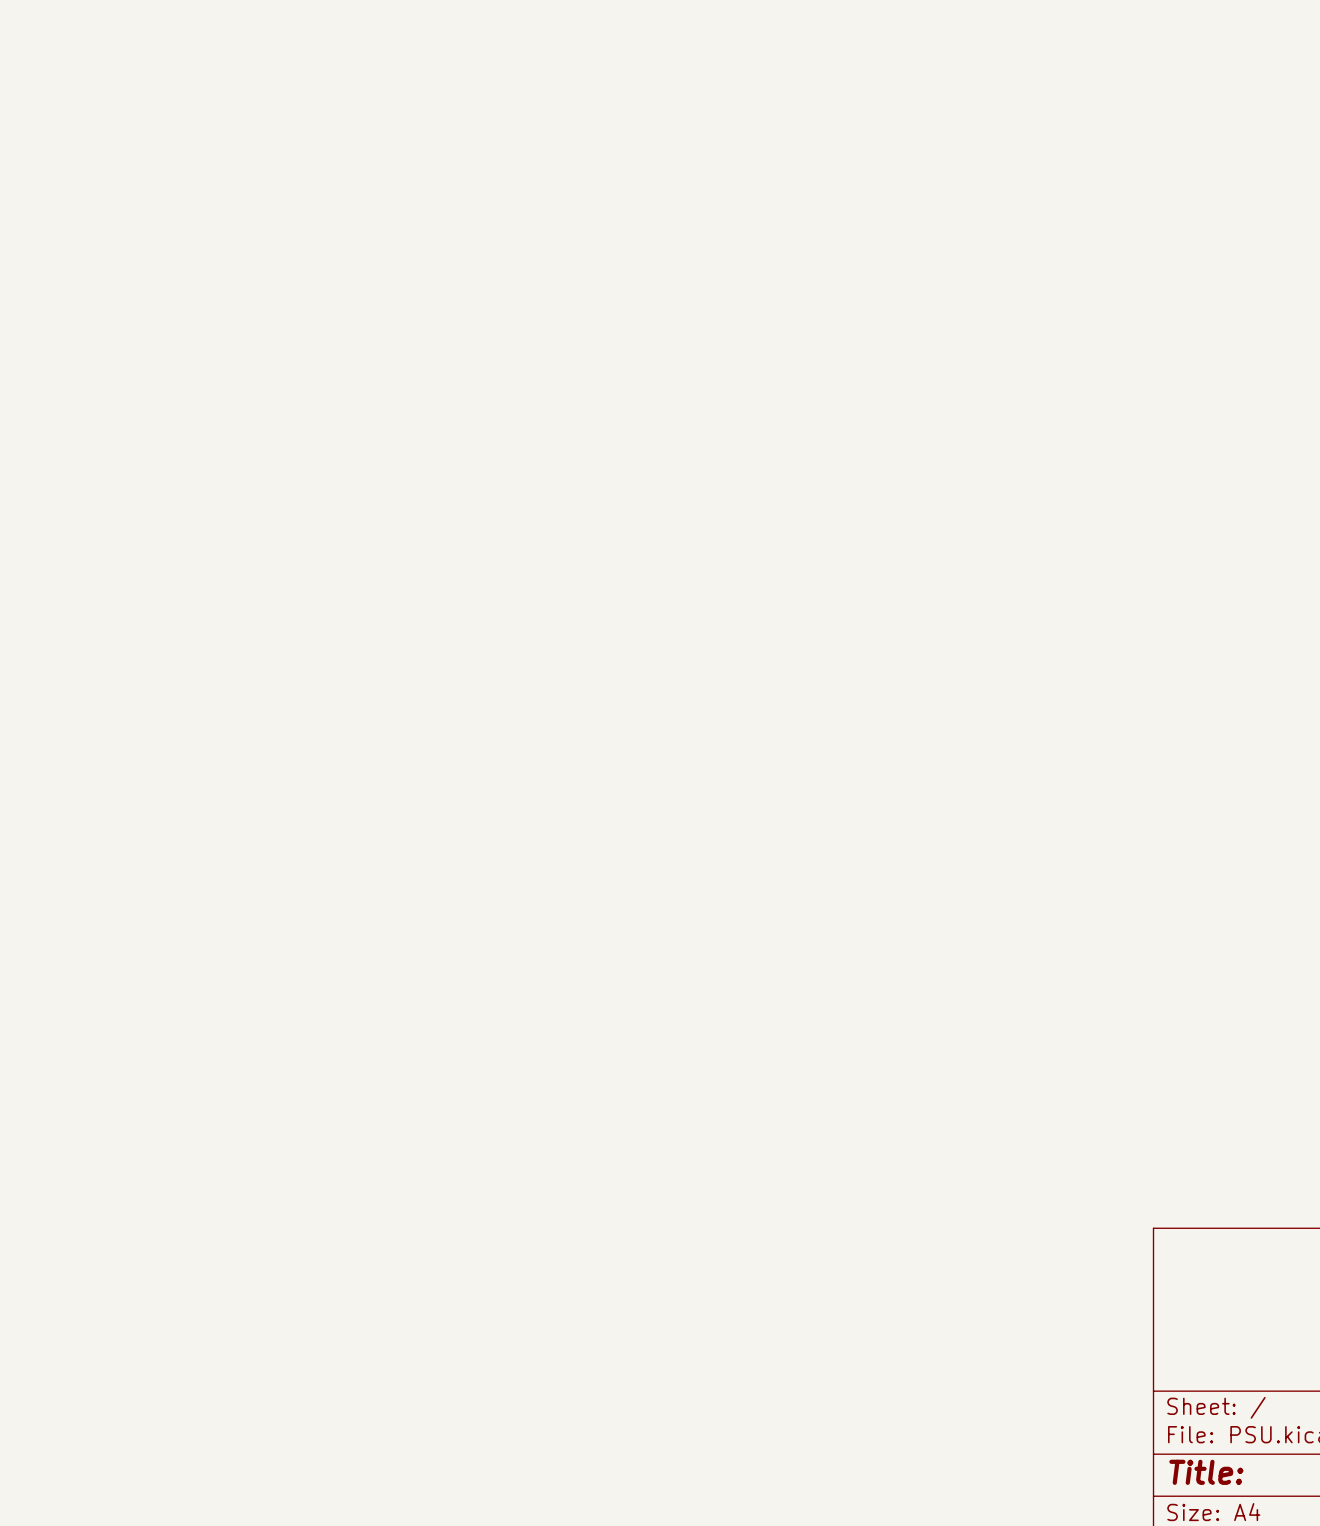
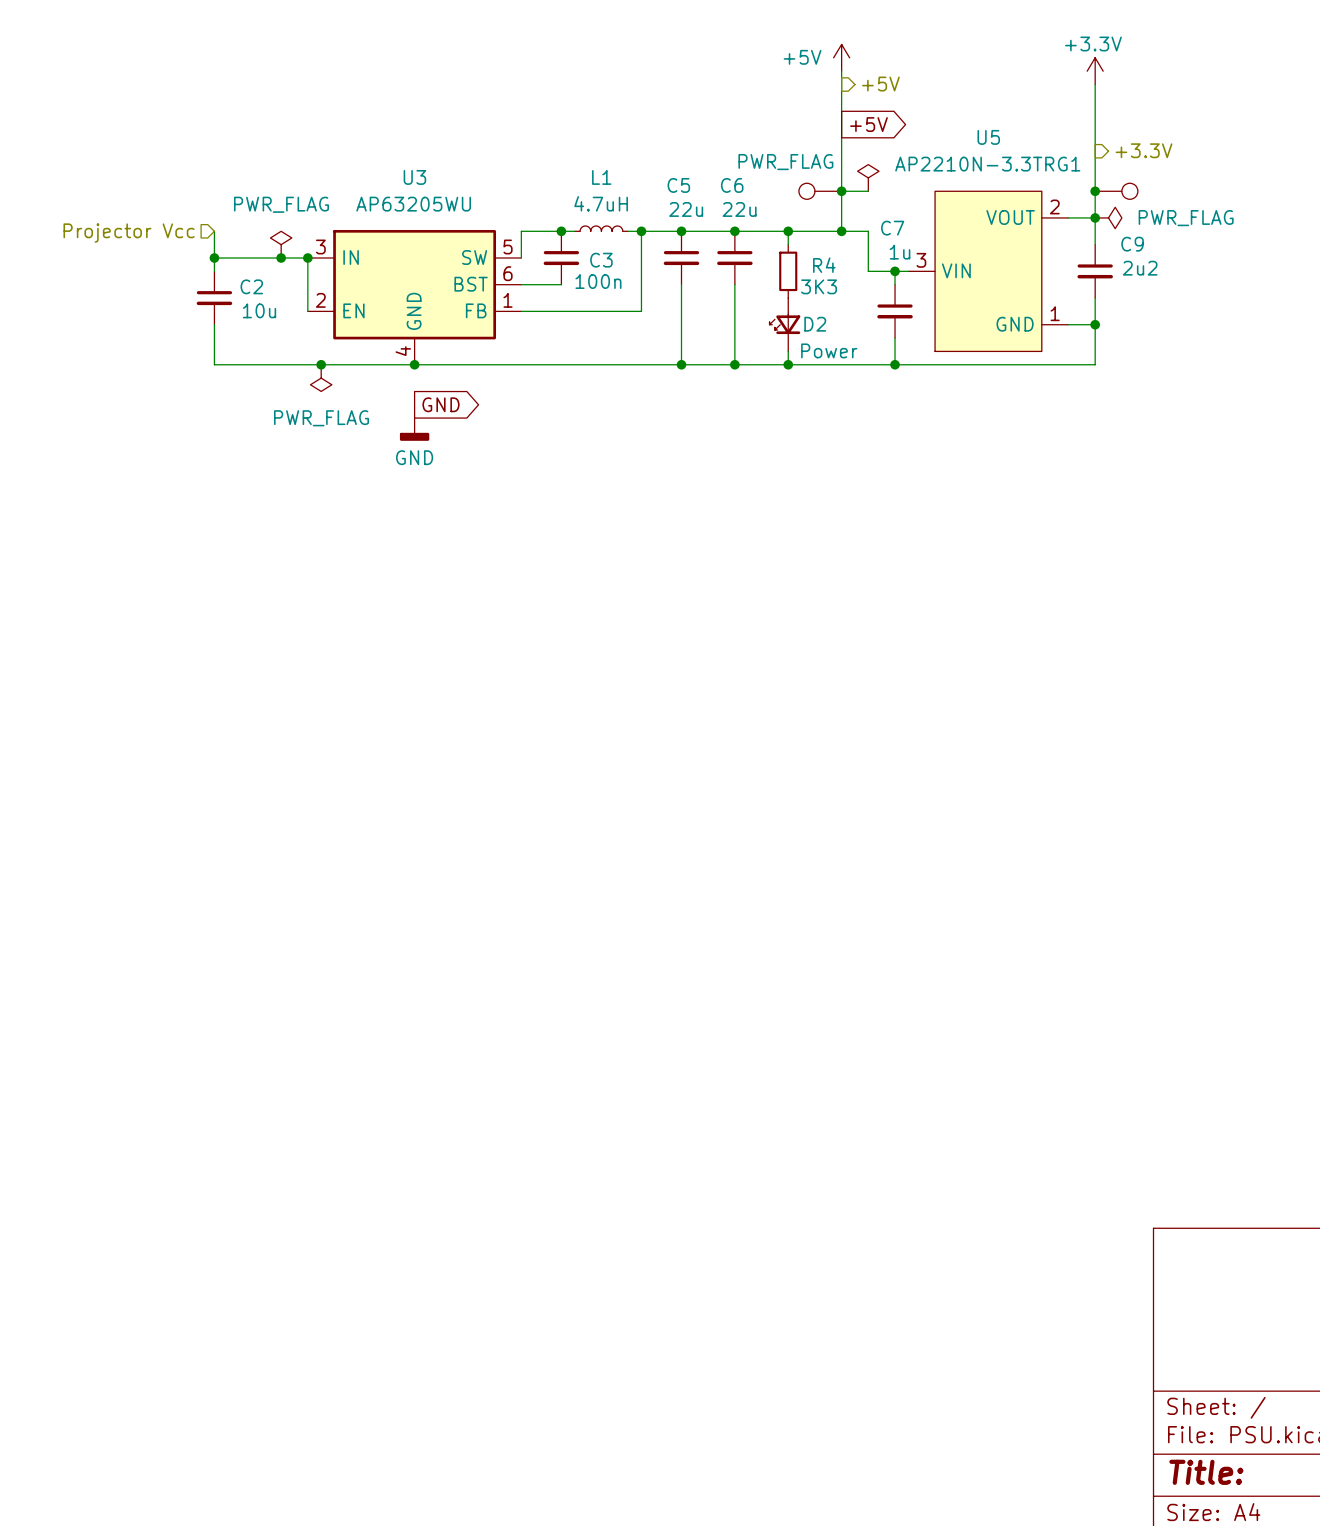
power symbol: none -> +5V (841, 57)
wire: none -> (841, 71) (841, 231)
power symbol: none -> +3.3V (1095, 71)
hierarchical label: none -> +5V (880, 84)
wire: none -> (1095, 84) (1095, 244)
global label: none -> +5V (868, 124)
hierarchical label: none -> +3.3V (1144, 150)
power symbol: none -> PWR_FLAG (868, 177)
part: none -> (820, 191)
wire: none -> (841, 191) (868, 191)
junction: none -> (841, 191)
junction: none -> (1095, 191)
part: none -> (1116, 191)
wire: none -> (1068, 217) (1095, 217)
junction: none -> (1095, 217)
power symbol: none -> PWR_FLAG (1108, 217)
L1: none -> 4.7uH (601, 228)
wire: none -> (214, 231) (214, 271)
junction: none -> (561, 231)
wire: none -> (574, 231) (521, 231) (521, 258)
wire: none -> (628, 231) (868, 231) (868, 271) (908, 271)
wire: none -> (641, 231) (641, 311) (521, 311)
junction: none -> (641, 231)
junction: none -> (681, 231)
junction: none -> (734, 231)
wire: none -> (788, 231) (788, 244)
junction: none -> (788, 231)
junction: none -> (841, 231)
hierarchical label: none -> Projector Vcc (129, 233)
power symbol: none -> PWR_FLAG (281, 244)
wire: none -> (214, 258) (307, 258) (307, 311)
junction: none -> (214, 258)
junction: none -> (281, 258)
junction: none -> (307, 258)
C3: none -> 100n (561, 258)
C5: none -> 22u (681, 258)
C6: none -> 22u (734, 258)
R4: none -> 3K3 (788, 271)
wire: none -> (895, 271) (895, 284)
junction: none -> (895, 271)
U5: none -> AP2210N-3.3TRG1 (988, 271)
C9: none -> 2u2 (1095, 271)
wire: none -> (521, 284) (561, 284)
wire: none -> (681, 284) (681, 364)
wire: none -> (734, 284) (734, 364)
U3: none -> AP63205WU (414, 297)
C2: none -> 10u (214, 298)
wire: none -> (1095, 298) (1095, 364) (214, 364) (214, 324)
C7: none -> 1u (895, 311)
D2: none -> Power (784, 324)
wire: none -> (1068, 324) (1095, 324)
junction: none -> (1095, 324)
wire: none -> (895, 338) (895, 364)
wire: none -> (788, 351) (788, 364)
junction: none -> (321, 364)
junction: none -> (414, 364)
junction: none -> (681, 364)
junction: none -> (734, 364)
junction: none -> (788, 364)
junction: none -> (895, 364)
power symbol: none -> PWR_FLAG (321, 378)
global label: none -> GND (440, 404)
power symbol: none -> GND (414, 429)

